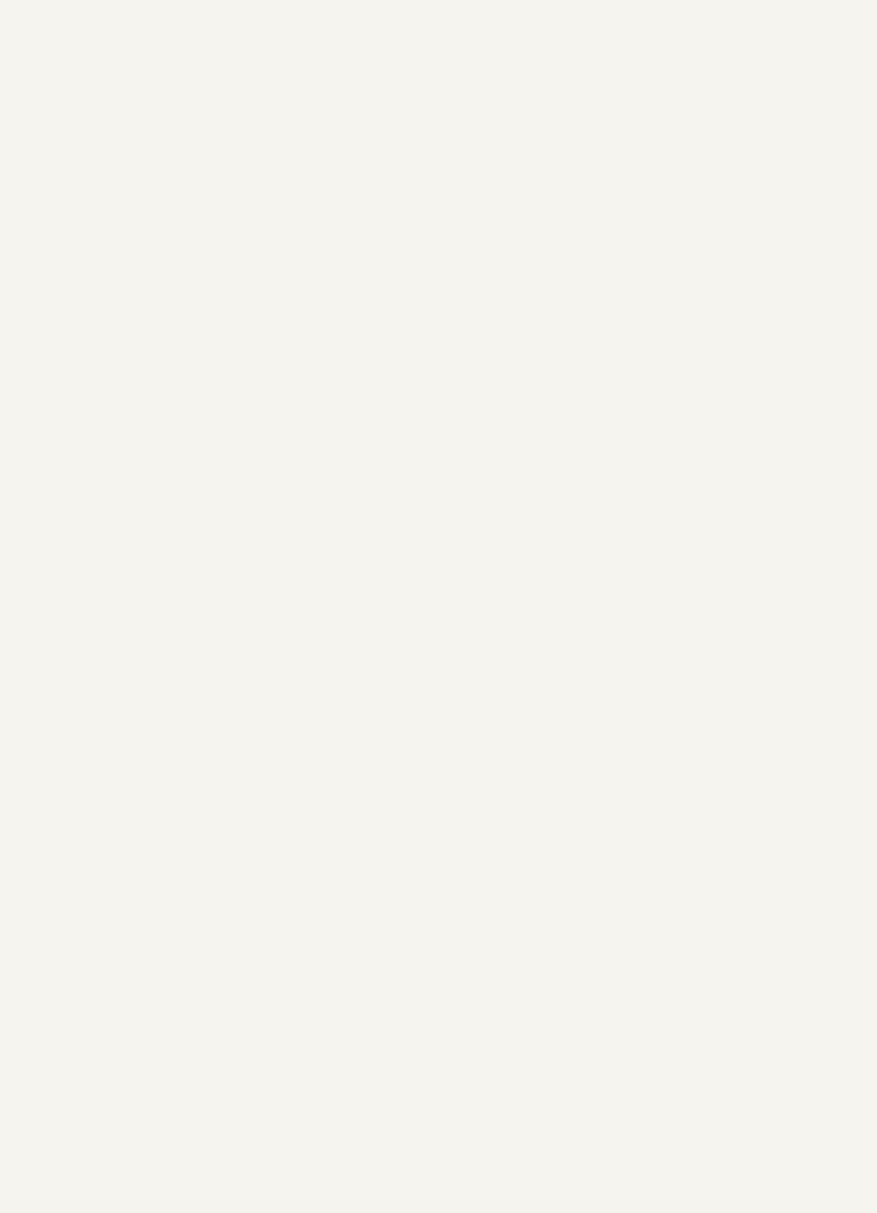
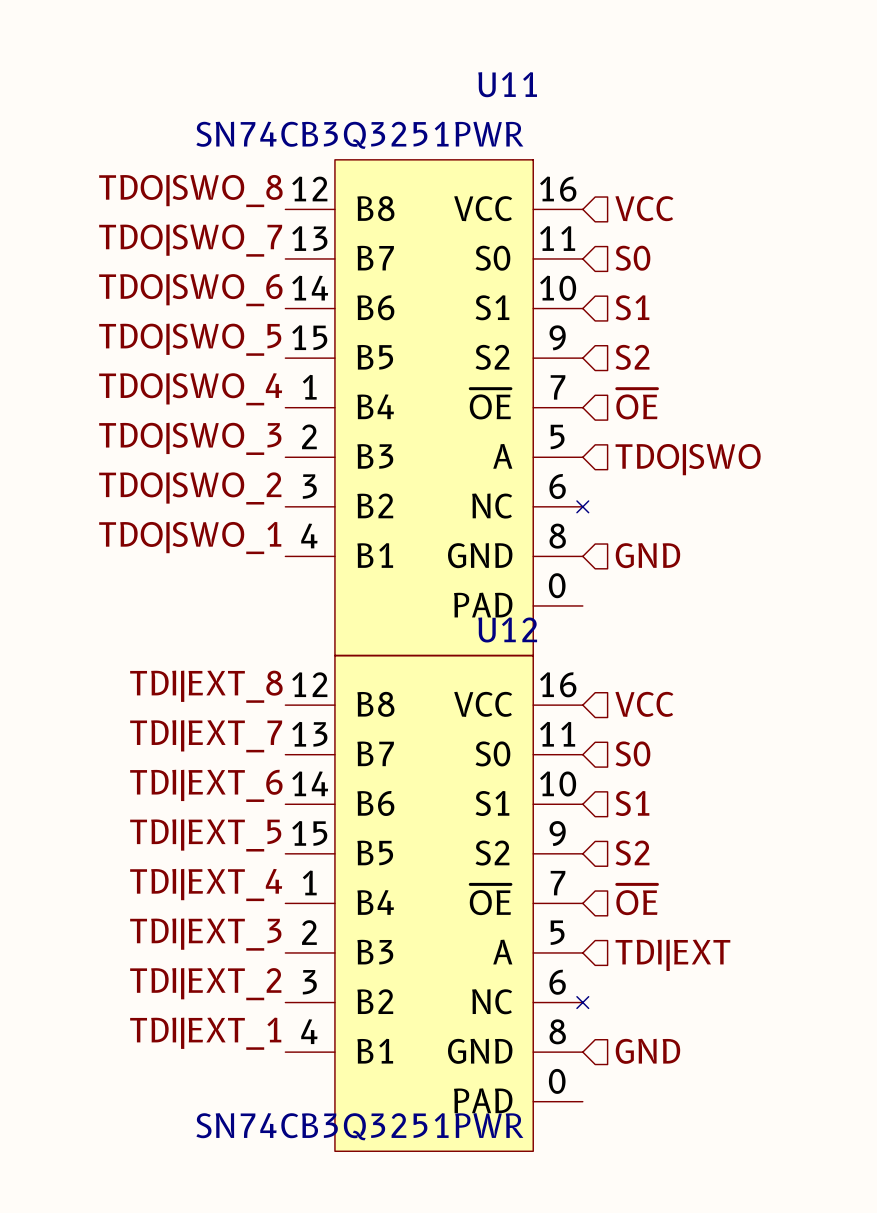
label: none -> TDO|SWO_8 (190, 191)
hierarchical label: none -> VCC (644, 208)
label: none -> TDO|SWO_7 (190, 240)
hierarchical label: none -> S0 (632, 258)
label: none -> TDO|SWO_6 (190, 290)
hierarchical label: none -> S1 (632, 307)
label: none -> TDO|SWO_5 (190, 339)
hierarchical label: none -> S2 (632, 357)
label: none -> TDO|SWO_4 (190, 389)
hierarchical label: none -> ~{OE} (636, 404)
U11: none -> SN74CB3Q3251PWR (437, 407)
label: none -> TDO|SWO_3 (190, 438)
hierarchical label: none -> TDO|SWO (688, 459)
label: none -> TDO|SWO_2 (190, 488)
label: none -> TDO|SWO_1 (190, 538)
hierarchical label: none -> GND (647, 555)
label: none -> TDI|EXT_8 (206, 686)
hierarchical label: none -> VCC (644, 704)
label: none -> TDI|EXT_7 (206, 736)
hierarchical label: none -> S0 (632, 753)
label: none -> TDI|EXT_6 (206, 785)
hierarchical label: none -> S1 (632, 803)
label: none -> TDI|EXT_5 (205, 835)
hierarchical label: none -> S2 (632, 853)
label: none -> TDI|EXT_4 (206, 885)
hierarchical label: none -> ~{OE} (636, 899)
U12: none -> SN74CB3Q3251PWR (437, 903)
label: none -> TDI|EXT_3 (205, 934)
hierarchical label: none -> TDI|EXT (672, 955)
label: none -> TDI|EXT_2 (205, 984)
label: none -> TDI|EXT_1 (205, 1033)
hierarchical label: none -> GND (647, 1051)

